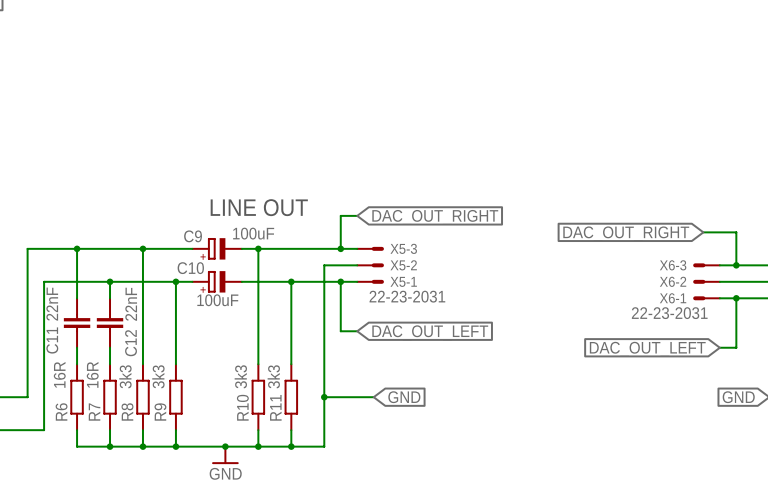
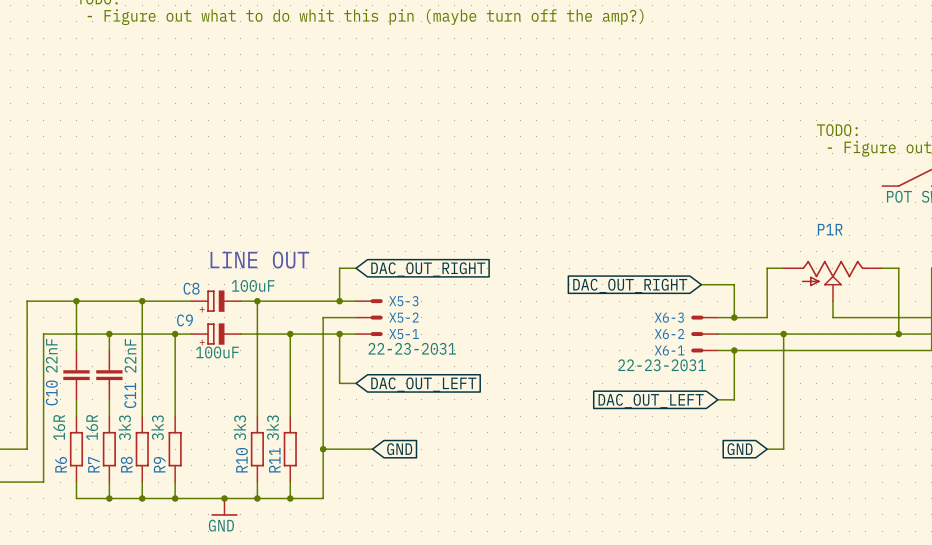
C9 name: C9 (193, 236) -> C8 (191, 288)
C10 name: C10 (190, 268) -> C9 (185, 320)
C11 name: C11 (52, 340) -> C10 (51, 392)
C12 name: C12 (131, 343) -> C11 (130, 395)

